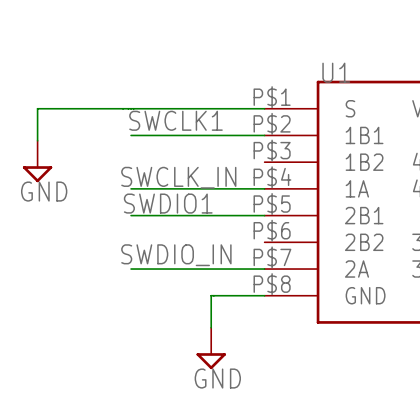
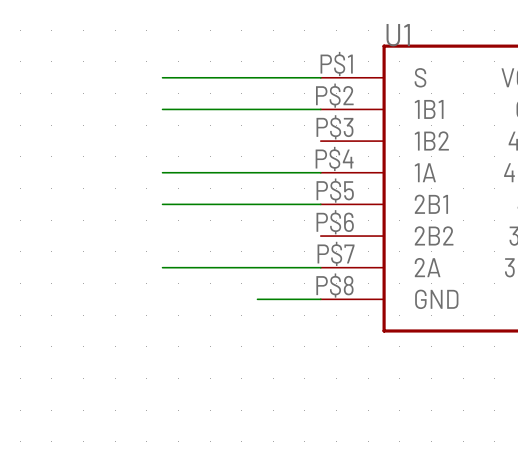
wire: (131, 108) (37, 108) (37, 140) -> none
label: SWCLK1 (175, 120) -> none
power symbol: GND (37, 161) -> none
label: SWCLK_IN (178, 177) -> none
label: SWDIO1 (168, 203) -> none
label: SWDIO_IN (176, 255) -> none
wire: (211, 295) (211, 327) -> none
power symbol: GND (211, 348) -> none

